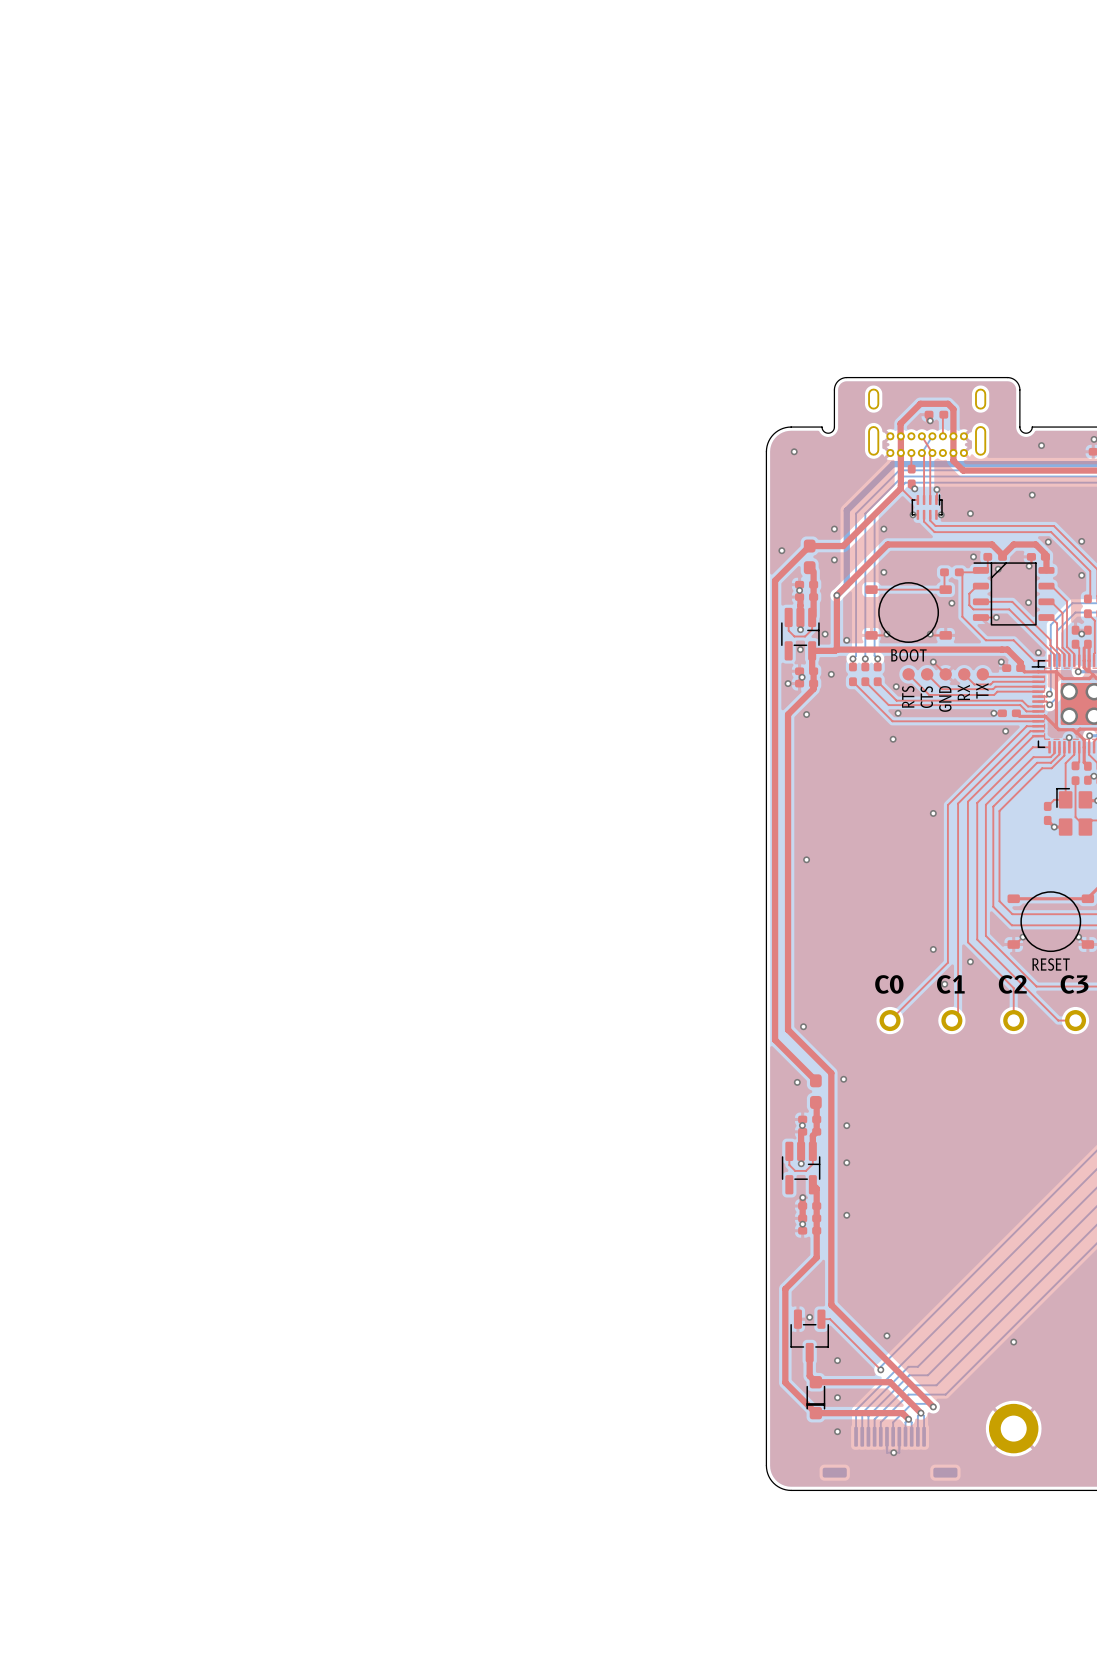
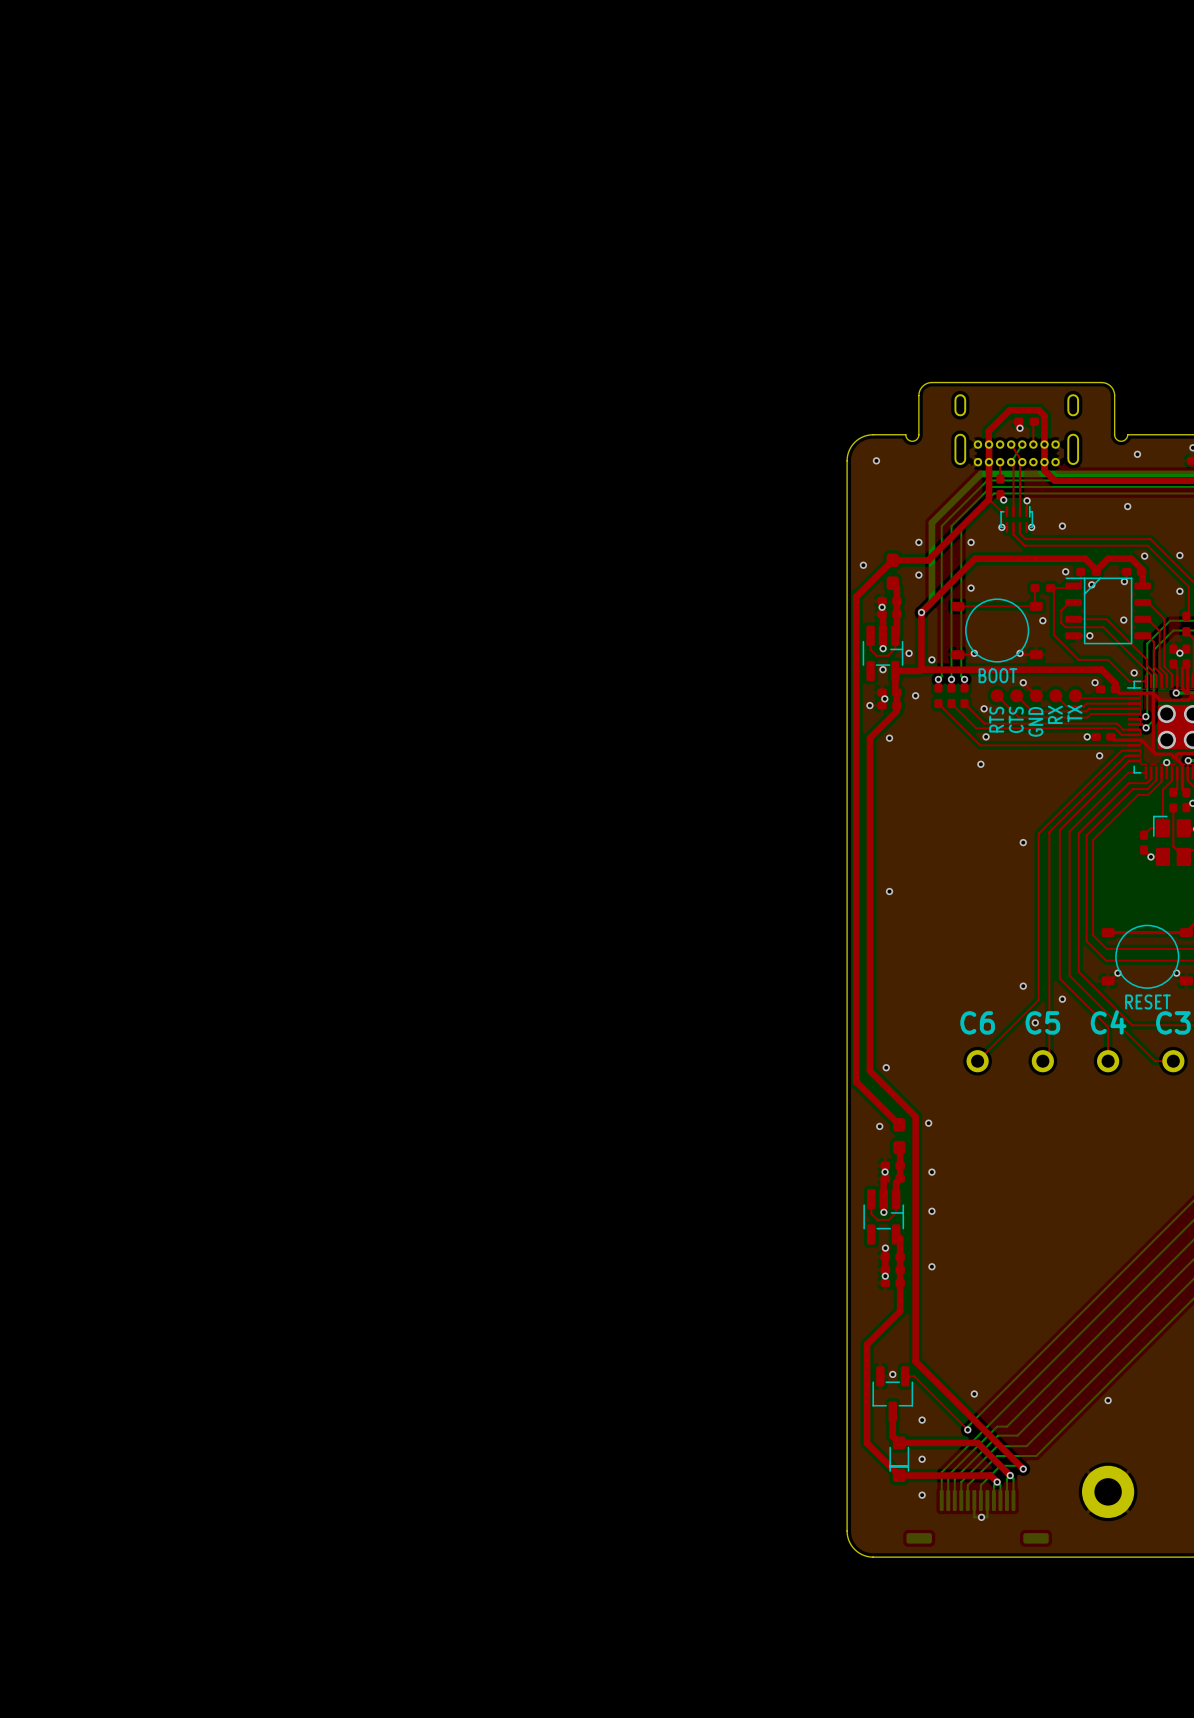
text: C0 (889, 984) -> C6 (977, 1022)
text: C1 (950, 984) -> C5 (1042, 1022)
text: C2 (1012, 984) -> C4 (1108, 1022)

